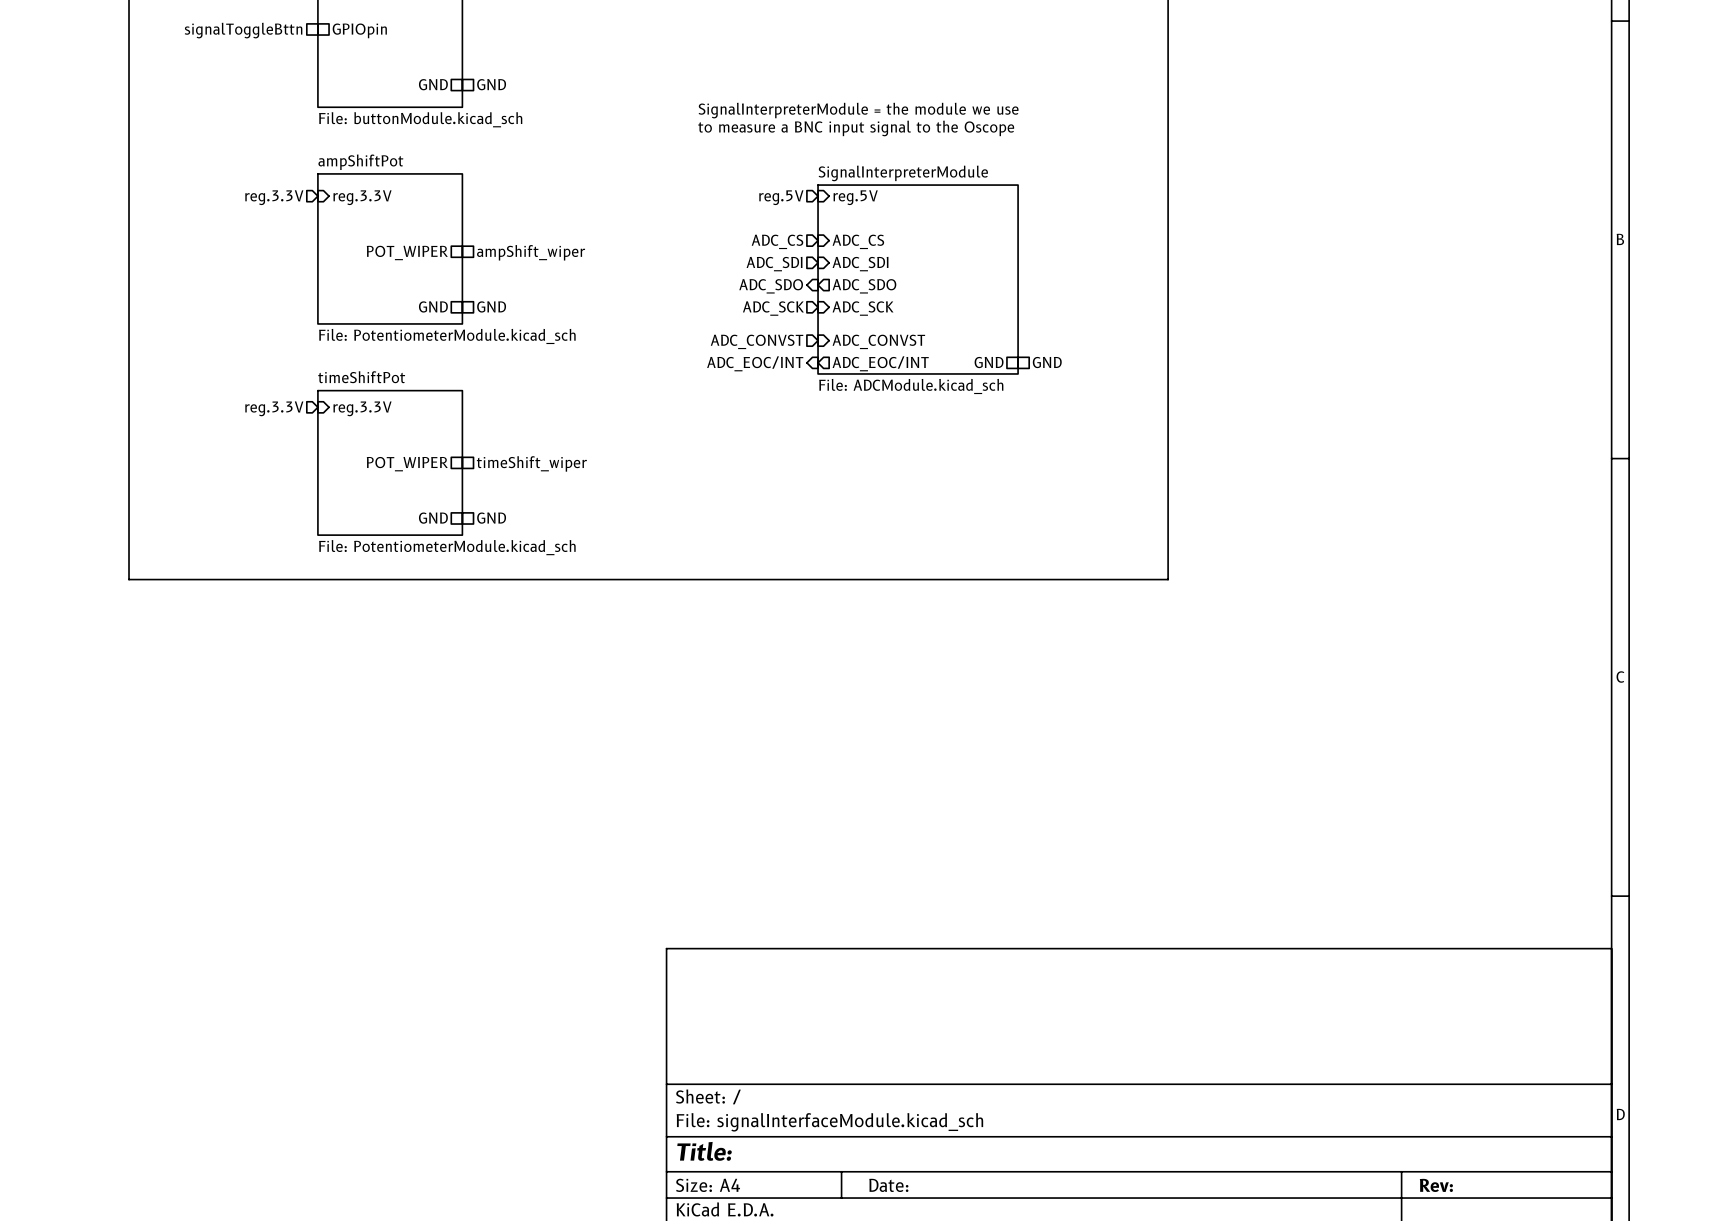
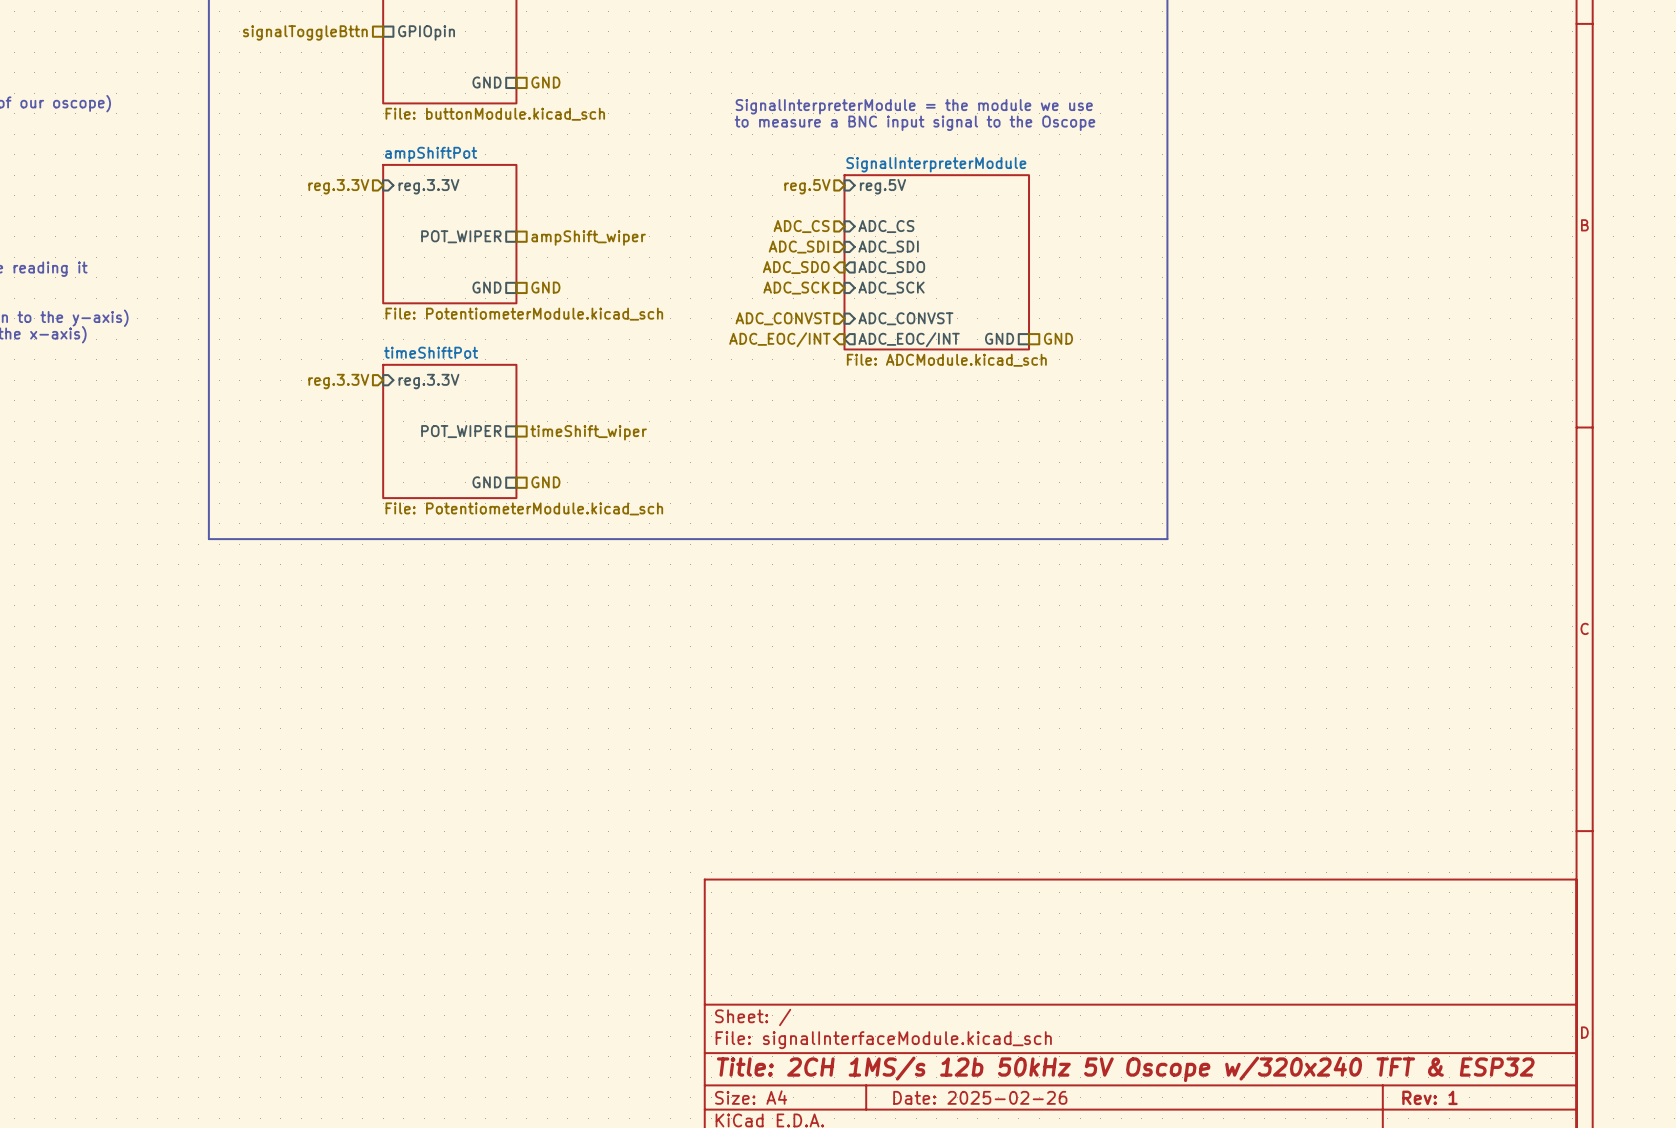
title block: Title: (704, 1151) -> Title: 2CH 1MS/s 12b 50kHz 5V Oscope w/320x240 TFT & ESP32 (1125, 1069)
title block: Date: (888, 1185) -> Date: 2025-02-26 (980, 1097)
title block: Rev: (1436, 1185) -> Rev: 1 (1429, 1097)

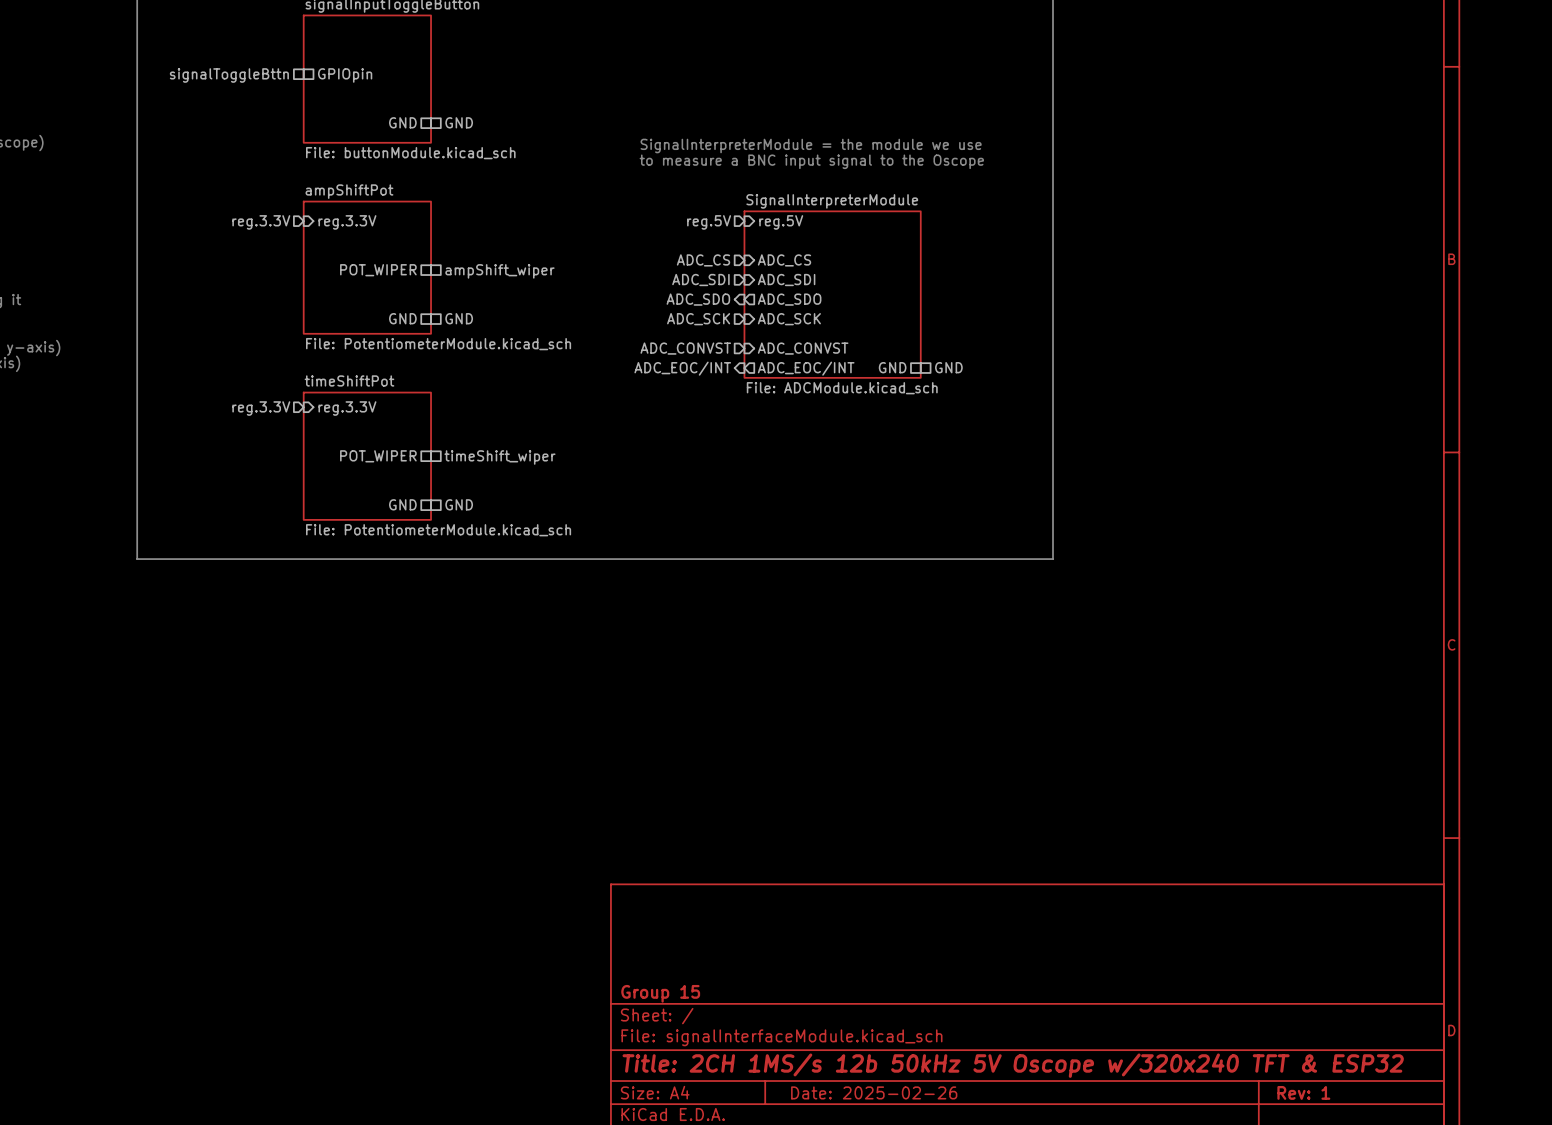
title block: none -> Group 15 (660, 993)

